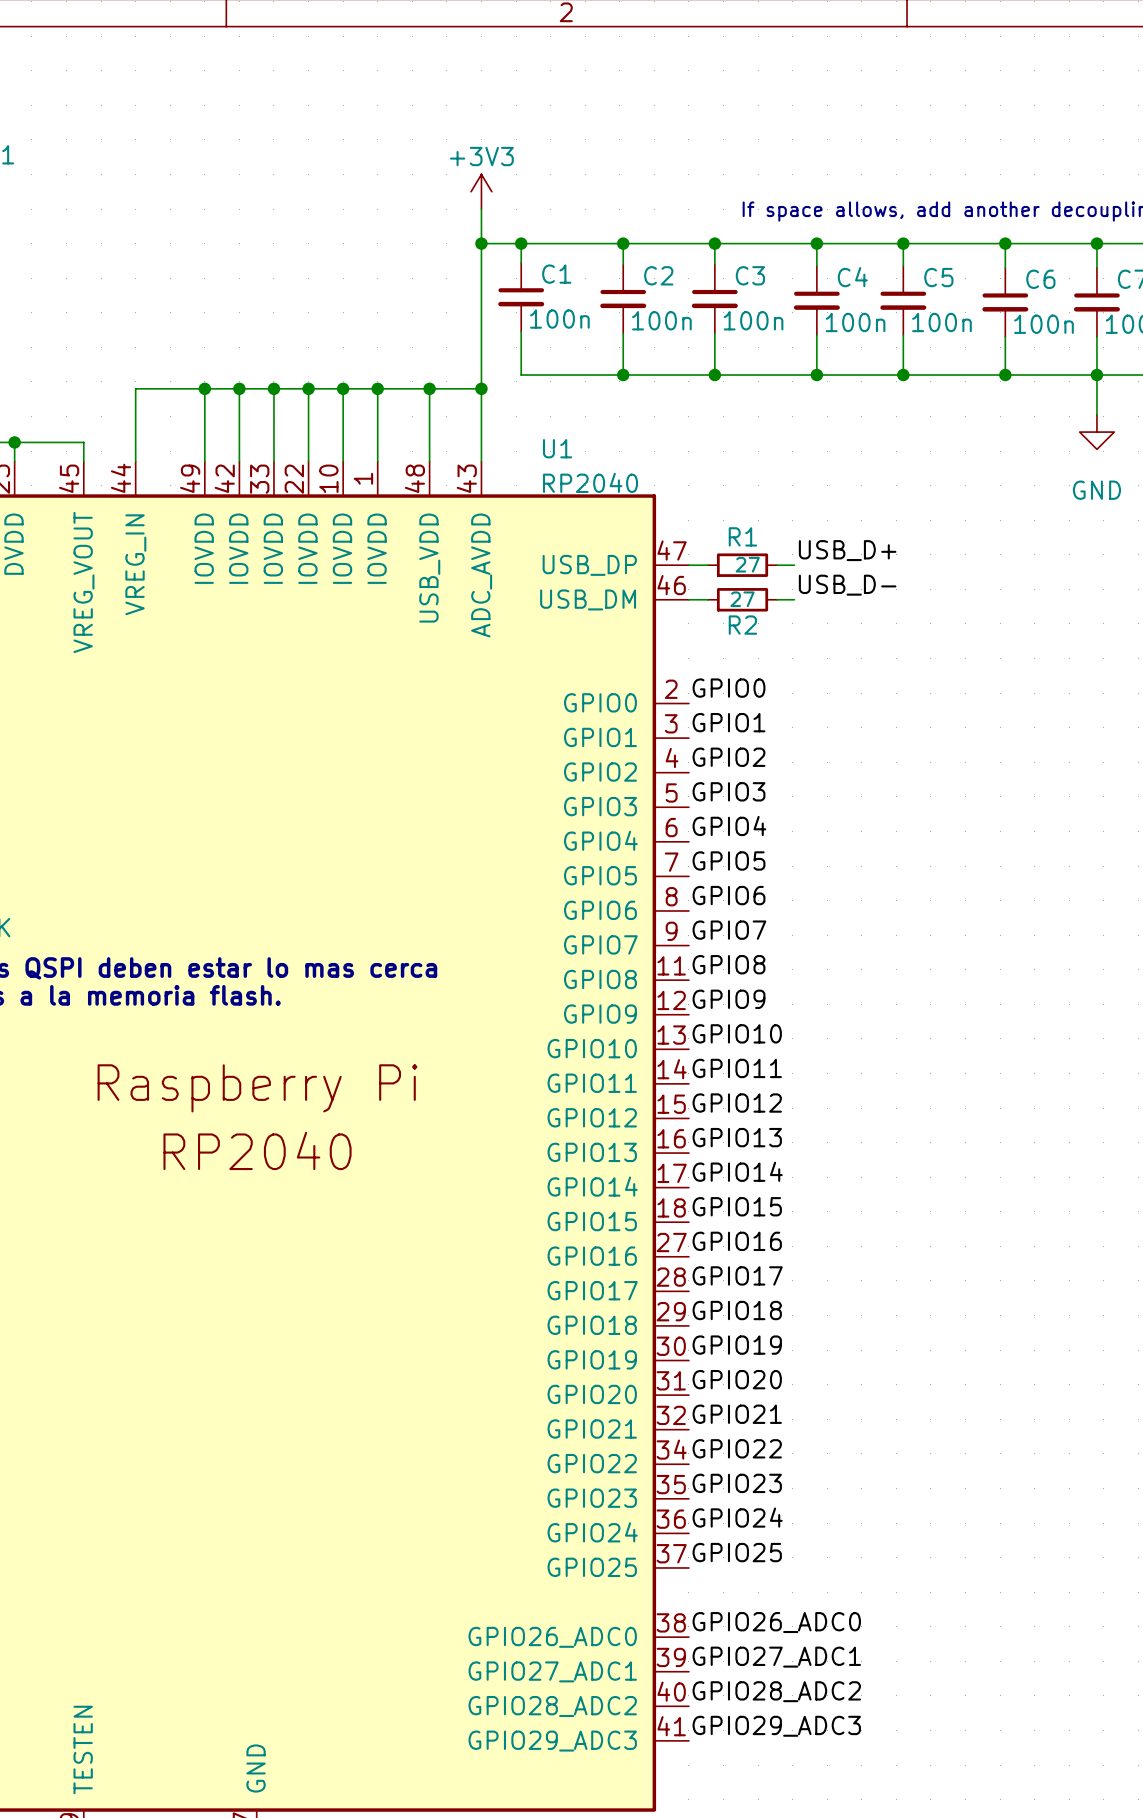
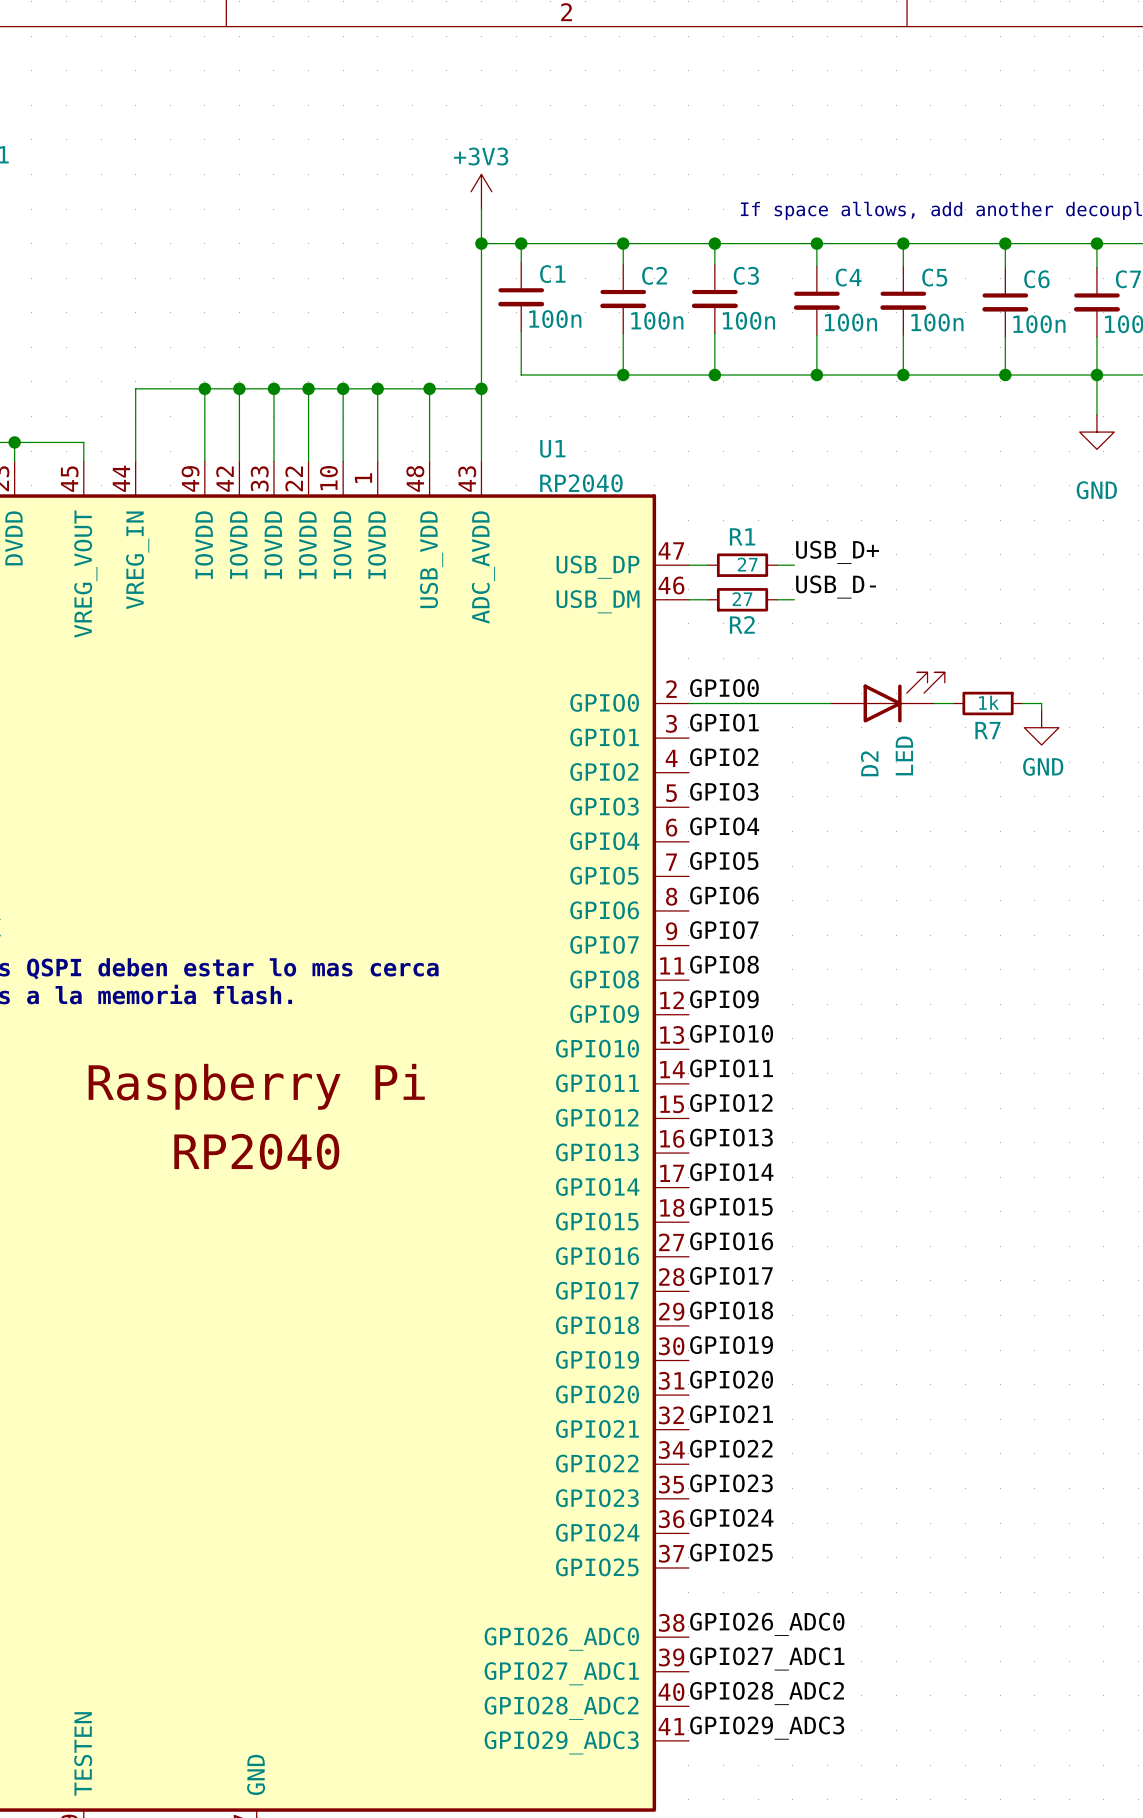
D2: none -> LED (887, 697)
wire: none -> (688, 703) (830, 703)
wire: none -> (934, 703) (953, 703)
R7: none -> 1k (988, 703)
wire: none -> (1022, 703) (1041, 703) (1041, 710)
power symbol: none -> GND (1041, 727)

